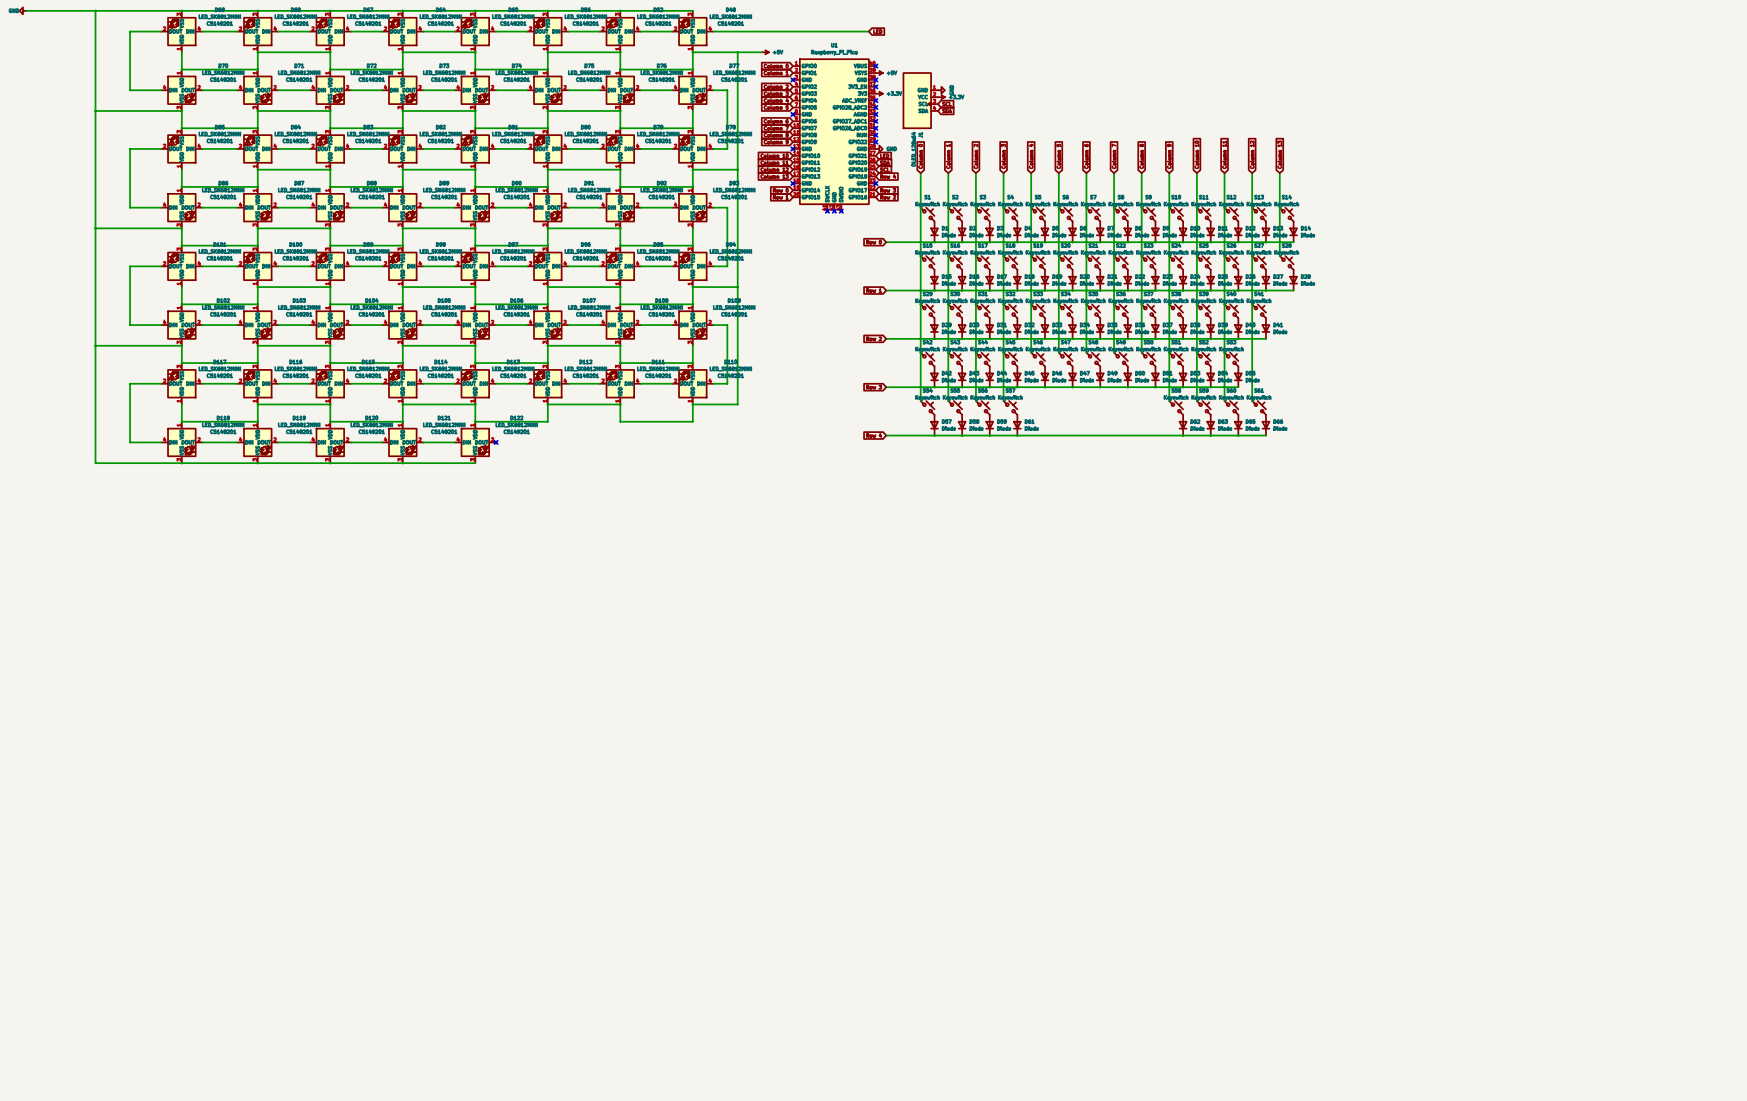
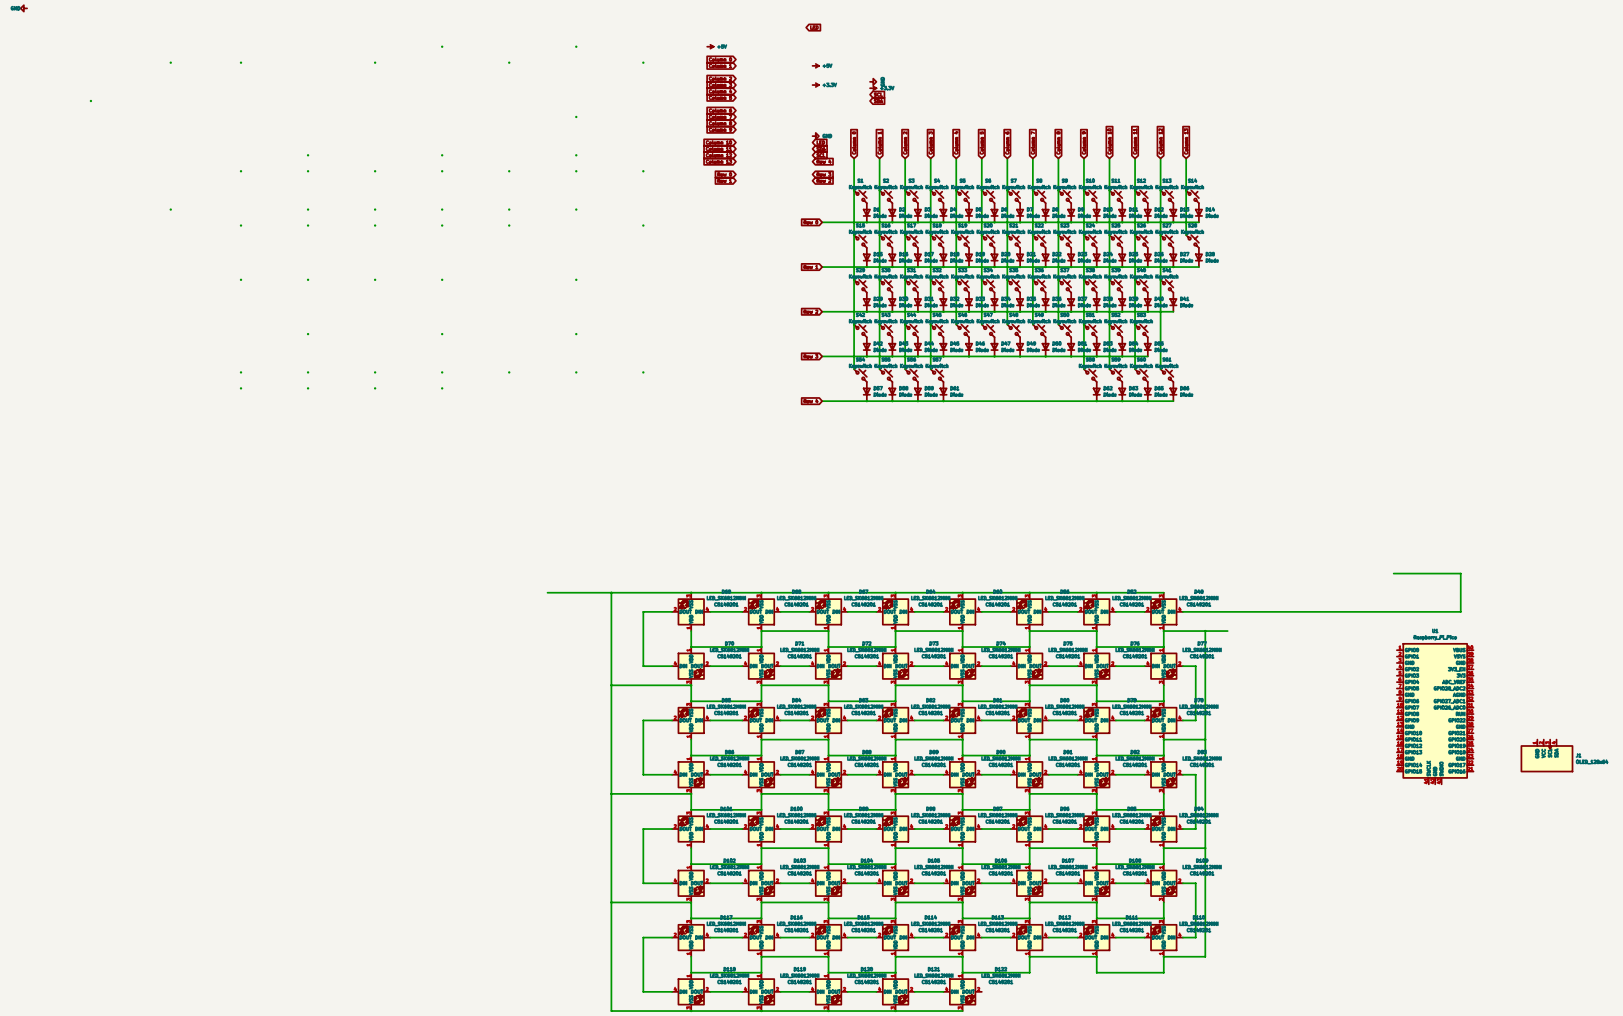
wire: (26, 10) (692, 10) -> none
wire: (95, 10) (95, 463) (475, 463) -> none
wire: (161, 31) (130, 31) (130, 90) (161, 90) -> none
part position: (181, 31) -> (691, 611)
wire: (202, 31) (237, 31) -> none
part position: (257, 31) -> (761, 611)
wire: (278, 31) (309, 31) -> none
part position: (330, 31) -> (828, 611)
wire: (351, 31) (382, 31) -> none
part position: (402, 31) -> (895, 611)
wire: (423, 31) (454, 31) -> none
part position: (475, 31) -> (962, 611)
wire: (496, 31) (527, 31) -> none
part position: (547, 31) -> (1029, 611)
wire: (568, 31) (599, 31) -> none
part position: (620, 31) -> (1096, 611)
wire: (641, 31) (672, 31) -> none
part position: (692, 31) -> (1163, 611)
wire: (713, 31) (868, 31) -> none
wire: (181, 52) (181, 69) (257, 69) (257, 52) (330, 52) (330, 69) (402, 69) (402, 52) (475, 52) (475, 69) (547, 69) (547, 52) (620, 52) (620, 69) (692, 69) (692, 52) (761, 52) -> none
wire: (737, 52) (737, 404) (692, 404) (692, 421) (620, 421) (620, 404) (547, 404) (547, 421) (475, 421) (475, 404) (402, 404) (402, 421) (330, 421) (330, 404) (257, 404) (257, 421) (181, 421) (181, 404) -> none
no-connect mark: (875, 66) -> none
no-connect mark: (792, 79) -> none
no-connect mark: (875, 79) -> none
no-connect mark: (875, 86) -> none
part position: (181, 90) -> (691, 666)
wire: (202, 90) (237, 90) -> none
part position: (257, 90) -> (761, 666)
wire: (278, 90) (309, 90) -> none
part position: (330, 90) -> (828, 666)
wire: (351, 90) (382, 90) -> none
part position: (402, 90) -> (895, 666)
wire: (423, 90) (454, 90) -> none
part position: (475, 90) -> (962, 666)
wire: (496, 90) (527, 90) -> none
part position: (547, 90) -> (1029, 666)
wire: (568, 90) (599, 90) -> none
part position: (620, 90) -> (1096, 666)
wire: (641, 90) (672, 90) -> none
part position: (692, 90) -> (1163, 666)
wire: (713, 90) (727, 90) (727, 148) (713, 148) -> none
no-connect mark: (875, 100) -> none
part rotation: 0° (917, 100) -> 90° counterclockwise (1546, 758)
part position: (920, 100) -> (1546, 755)
no-connect mark: (875, 107) -> none
wire: (95, 110) (181, 110) (181, 128) (257, 128) (257, 110) (330, 110) (330, 128) (402, 128) (402, 110) (475, 110) (475, 128) (547, 128) (547, 110) (620, 110) (620, 128) (692, 128) (692, 110) -> none
no-connect mark: (792, 114) -> none
no-connect mark: (875, 114) -> none
no-connect mark: (875, 121) -> none
no-connect mark: (875, 128) -> none
part position: (834, 135) -> (1435, 714)
no-connect mark: (875, 135) -> none
no-connect mark: (875, 142) -> none
wire: (161, 148) (130, 148) (130, 207) (161, 207) -> none
part position: (181, 148) -> (691, 720)
wire: (202, 148) (237, 148) -> none
part position: (257, 148) -> (761, 720)
wire: (278, 148) (309, 148) -> none
part position: (330, 148) -> (828, 720)
wire: (351, 148) (382, 148) -> none
part position: (402, 148) -> (895, 720)
wire: (423, 148) (454, 148) -> none
part position: (475, 148) -> (962, 720)
wire: (496, 148) (527, 148) -> none
part position: (547, 148) -> (1029, 720)
wire: (568, 148) (599, 148) -> none
part position: (620, 148) -> (1096, 720)
wire: (641, 148) (672, 148) -> none
part position: (692, 148) -> (1163, 720)
no-connect mark: (792, 148) -> none
wire: (181, 169) (181, 186) (257, 186) (257, 169) (330, 169) (330, 186) (402, 186) (402, 169) (475, 169) (475, 186) (547, 186) (547, 169) (620, 169) (620, 186) (692, 186) (692, 169) (737, 169) -> none
no-connect mark: (792, 183) -> none
no-connect mark: (875, 183) -> none
part position: (181, 207) -> (691, 774)
wire: (202, 207) (237, 207) -> none
part position: (257, 207) -> (761, 774)
wire: (278, 207) (309, 207) -> none
part position: (330, 207) -> (828, 774)
wire: (351, 207) (382, 207) -> none
part position: (402, 207) -> (895, 774)
wire: (423, 207) (454, 207) -> none
part position: (475, 207) -> (962, 774)
wire: (496, 207) (527, 207) -> none
part position: (547, 207) -> (1029, 774)
wire: (568, 207) (599, 207) -> none
part position: (620, 207) -> (1096, 774)
wire: (641, 207) (672, 207) -> none
part position: (692, 207) -> (1163, 774)
wire: (713, 207) (727, 207) (727, 266) (713, 266) -> none
no-connect mark: (827, 211) -> none
no-connect mark: (834, 211) -> none
no-connect mark: (841, 211) -> none
wire: (95, 228) (181, 228) (181, 245) (257, 245) (257, 228) (330, 228) (330, 245) (402, 245) (402, 228) (475, 228) (475, 245) (547, 245) (547, 228) (620, 228) (620, 245) (692, 245) (692, 228) -> none
wire: (161, 266) (130, 266) (130, 325) (161, 325) -> none
part position: (181, 266) -> (691, 829)
wire: (202, 266) (237, 266) -> none
part position: (257, 266) -> (761, 829)
wire: (278, 266) (309, 266) -> none
part position: (330, 266) -> (828, 829)
wire: (351, 266) (382, 266) -> none
part position: (402, 266) -> (895, 829)
wire: (423, 266) (454, 266) -> none
part position: (475, 266) -> (962, 829)
wire: (496, 266) (527, 266) -> none
part position: (547, 266) -> (1029, 829)
wire: (568, 266) (599, 266) -> none
part position: (620, 266) -> (1096, 829)
wire: (641, 266) (672, 266) -> none
part position: (692, 266) -> (1163, 829)
wire: (181, 287) (181, 304) (257, 304) (257, 287) (330, 287) (330, 304) (402, 304) (402, 287) (475, 287) (475, 304) (547, 304) (547, 287) (620, 287) (620, 304) (692, 304) (692, 287) (737, 287) -> none
part position: (181, 325) -> (691, 883)
wire: (202, 325) (237, 325) -> none
part position: (257, 325) -> (761, 883)
wire: (278, 325) (309, 325) -> none
part position: (330, 325) -> (828, 883)
wire: (351, 325) (382, 325) -> none
part position: (402, 325) -> (895, 883)
wire: (423, 325) (454, 325) -> none
part position: (475, 325) -> (962, 883)
wire: (496, 325) (527, 325) -> none
part position: (547, 325) -> (1029, 883)
wire: (568, 325) (599, 325) -> none
part position: (620, 325) -> (1096, 883)
wire: (641, 325) (672, 325) -> none
part position: (692, 325) -> (1163, 883)
wire: (713, 325) (727, 325) (727, 383) (713, 383) -> none
wire: (95, 345) (181, 345) (181, 363) (257, 363) (257, 345) (330, 345) (330, 363) (402, 363) (402, 345) (475, 345) (475, 363) (547, 363) (547, 345) (620, 345) (620, 363) (692, 363) (692, 345) -> none
wire: (161, 383) (130, 383) (130, 442) (161, 442) -> none
part position: (181, 383) -> (691, 937)
wire: (202, 383) (237, 383) -> none
part position: (257, 383) -> (761, 937)
wire: (278, 383) (309, 383) -> none
part position: (330, 383) -> (828, 937)
wire: (351, 383) (382, 383) -> none
part position: (402, 383) -> (895, 937)
wire: (423, 383) (454, 383) -> none
part position: (475, 383) -> (962, 937)
wire: (496, 383) (527, 383) -> none
part position: (547, 383) -> (1029, 937)
wire: (568, 383) (599, 383) -> none
part position: (620, 383) -> (1096, 937)
wire: (641, 383) (672, 383) -> none
part position: (692, 383) -> (1163, 937)
part position: (181, 442) -> (691, 991)
wire: (202, 442) (237, 442) -> none
part position: (257, 442) -> (761, 991)
wire: (278, 442) (309, 442) -> none
part position: (330, 442) -> (828, 991)
wire: (351, 442) (382, 442) -> none
part position: (402, 442) -> (895, 991)
wire: (423, 442) (454, 442) -> none
part position: (475, 442) -> (962, 991)
no-connect mark: (496, 442) -> none
wire: none -> (1393, 573) (1460, 573) (1460, 611) (1182, 611)
wire: none -> (547, 592) (1163, 592)
wire: none -> (611, 592) (611, 1011) (962, 1011)
wire: none -> (672, 611) (643, 611) (643, 666) (672, 666)
wire: none -> (710, 611) (742, 611)
wire: none -> (780, 611) (809, 611)
wire: none -> (847, 611) (876, 611)
wire: none -> (914, 611) (943, 611)
wire: none -> (981, 611) (1010, 611)
wire: none -> (1048, 611) (1077, 611)
wire: none -> (1115, 611) (1144, 611)
wire: none -> (691, 631) (691, 647) (761, 647) (761, 631) (828, 631) (828, 647) (895, 647) (895, 631) (962, 631) (962, 647) (1029, 647) (1029, 631) (1096, 631) (1096, 647) (1163, 647) (1163, 631) (1227, 631)
wire: none -> (1205, 631) (1205, 956) (1163, 956) (1163, 972) (1096, 972) (1096, 956) (1029, 956) (1029, 972) (962, 972) (962, 956) (895, 956) (895, 972) (828, 972) (828, 956) (761, 956) (761, 972) (691, 972) (691, 956)
wire: none -> (710, 666) (742, 666)
wire: none -> (780, 666) (809, 666)
wire: none -> (847, 666) (876, 666)
wire: none -> (914, 666) (943, 666)
wire: none -> (981, 666) (1010, 666)
wire: none -> (1048, 666) (1077, 666)
wire: none -> (1115, 666) (1144, 666)
wire: none -> (1182, 666) (1195, 666) (1195, 720) (1182, 720)
wire: none -> (611, 685) (691, 685) (691, 701) (761, 701) (761, 685) (828, 685) (828, 701) (895, 701) (895, 685) (962, 685) (962, 701) (1029, 701) (1029, 685) (1096, 685) (1096, 701) (1163, 701) (1163, 685)
wire: none -> (672, 720) (643, 720) (643, 774) (672, 774)
wire: none -> (710, 720) (742, 720)
wire: none -> (780, 720) (809, 720)
wire: none -> (847, 720) (876, 720)
wire: none -> (914, 720) (943, 720)
wire: none -> (981, 720) (1010, 720)
wire: none -> (1048, 720) (1077, 720)
wire: none -> (1115, 720) (1144, 720)
wire: none -> (691, 739) (691, 755) (761, 755) (761, 739) (828, 739) (828, 755) (895, 755) (895, 739) (962, 739) (962, 755) (1029, 755) (1029, 739) (1096, 739) (1096, 755) (1163, 755) (1163, 739) (1205, 739)
wire: none -> (710, 774) (742, 774)
wire: none -> (780, 774) (809, 774)
wire: none -> (847, 774) (876, 774)
wire: none -> (914, 774) (943, 774)
wire: none -> (981, 774) (1010, 774)
wire: none -> (1048, 774) (1077, 774)
wire: none -> (1115, 774) (1144, 774)
wire: none -> (1182, 774) (1195, 774) (1195, 829) (1182, 829)
wire: none -> (611, 793) (691, 793) (691, 809) (761, 809) (761, 793) (828, 793) (828, 809) (895, 809) (895, 793) (962, 793) (962, 809) (1029, 809) (1029, 793) (1096, 793) (1096, 809) (1163, 809) (1163, 793)
wire: none -> (672, 829) (643, 829) (643, 883) (672, 883)
wire: none -> (710, 829) (742, 829)
wire: none -> (780, 829) (809, 829)
wire: none -> (847, 829) (876, 829)
wire: none -> (914, 829) (943, 829)
wire: none -> (981, 829) (1010, 829)
wire: none -> (1048, 829) (1077, 829)
wire: none -> (1115, 829) (1144, 829)
wire: none -> (691, 848) (691, 864) (761, 864) (761, 848) (828, 848) (828, 864) (895, 864) (895, 848) (962, 848) (962, 864) (1029, 864) (1029, 848) (1096, 848) (1096, 864) (1163, 864) (1163, 848) (1205, 848)
wire: none -> (710, 883) (742, 883)
wire: none -> (780, 883) (809, 883)
wire: none -> (847, 883) (876, 883)
wire: none -> (914, 883) (943, 883)
wire: none -> (981, 883) (1010, 883)
wire: none -> (1048, 883) (1077, 883)
wire: none -> (1115, 883) (1144, 883)
wire: none -> (1182, 883) (1195, 883) (1195, 937) (1182, 937)
wire: none -> (611, 902) (691, 902) (691, 918) (761, 918) (761, 902) (828, 902) (828, 918) (895, 918) (895, 902) (962, 902) (962, 918) (1029, 918) (1029, 902) (1096, 902) (1096, 918) (1163, 918) (1163, 902)
wire: none -> (672, 937) (643, 937) (643, 991) (672, 991)
wire: none -> (710, 937) (742, 937)
wire: none -> (780, 937) (809, 937)
wire: none -> (847, 937) (876, 937)
wire: none -> (914, 937) (943, 937)
wire: none -> (981, 937) (1010, 937)
wire: none -> (1048, 937) (1077, 937)
wire: none -> (1115, 937) (1144, 937)
wire: none -> (710, 991) (742, 991)
wire: none -> (780, 991) (809, 991)
wire: none -> (847, 991) (876, 991)
wire: none -> (914, 991) (943, 991)

